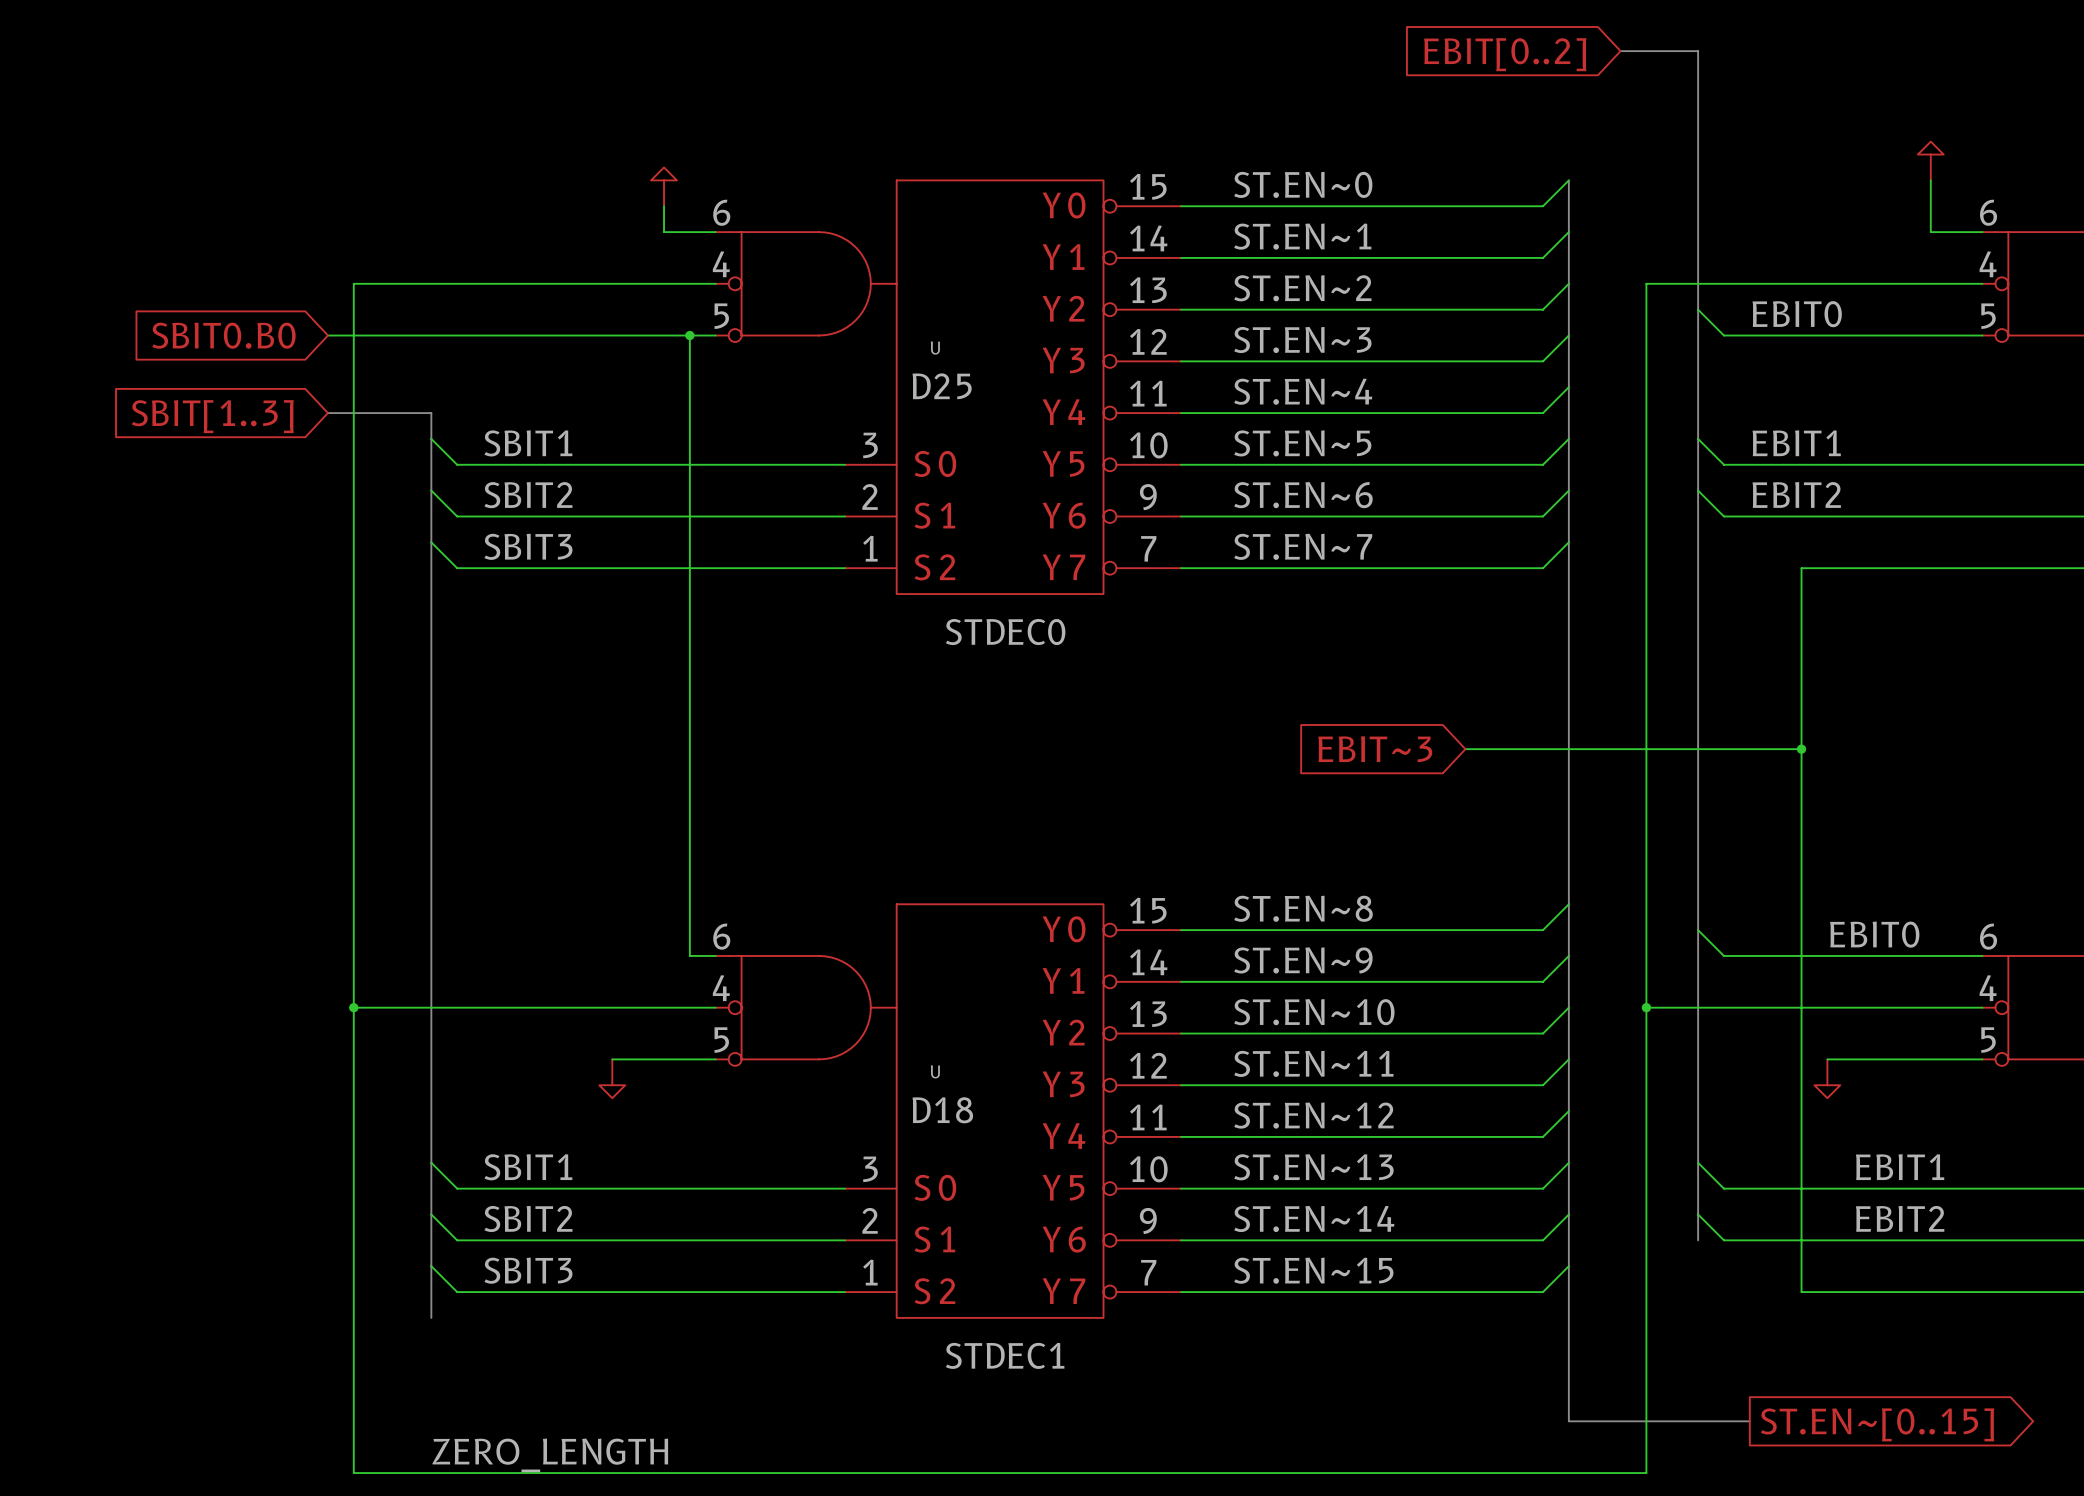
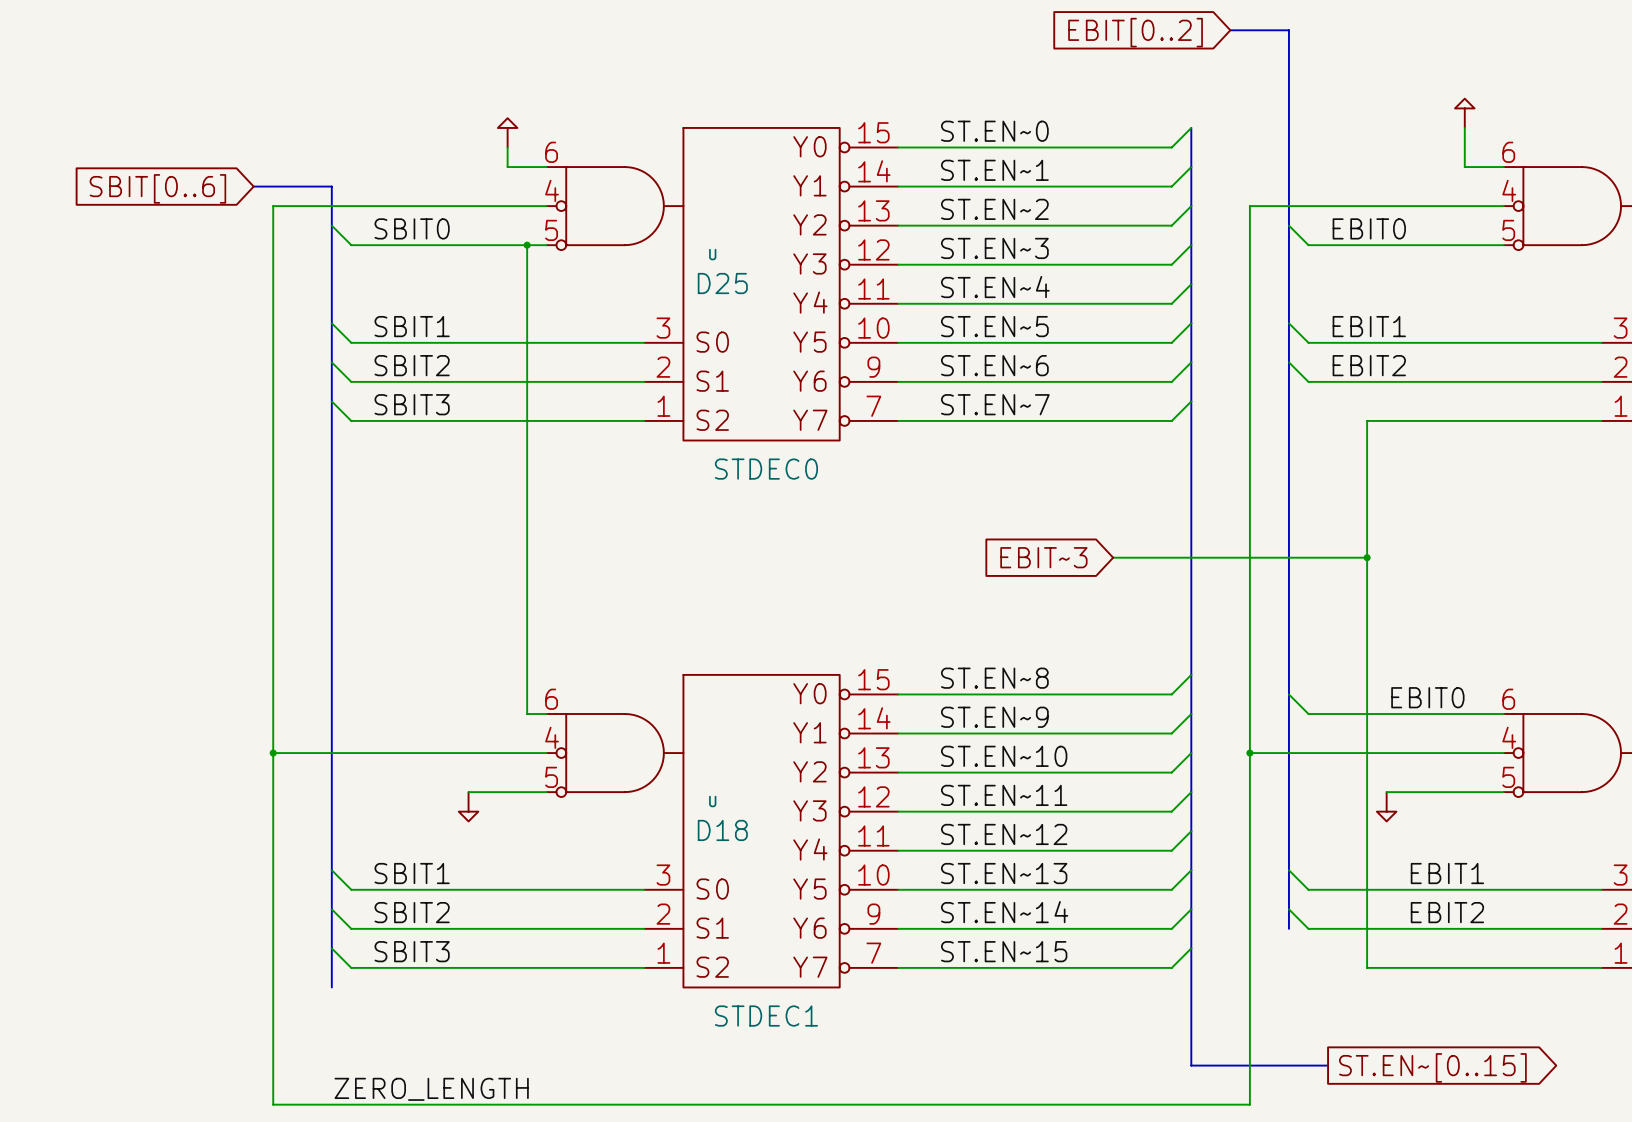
global label: none -> SBIT[0..6] (157, 188)
label: none -> SBIT0 (412, 228)
global label: SBIT0.B0 (223, 335) -> none
wire: (327, 335) (457, 335) -> (331, 225) (351, 245)
bus: (327, 413) (431, 413) -> (253, 186) (331, 186) (331, 303)
global label: SBIT[1..3] (212, 416) -> none

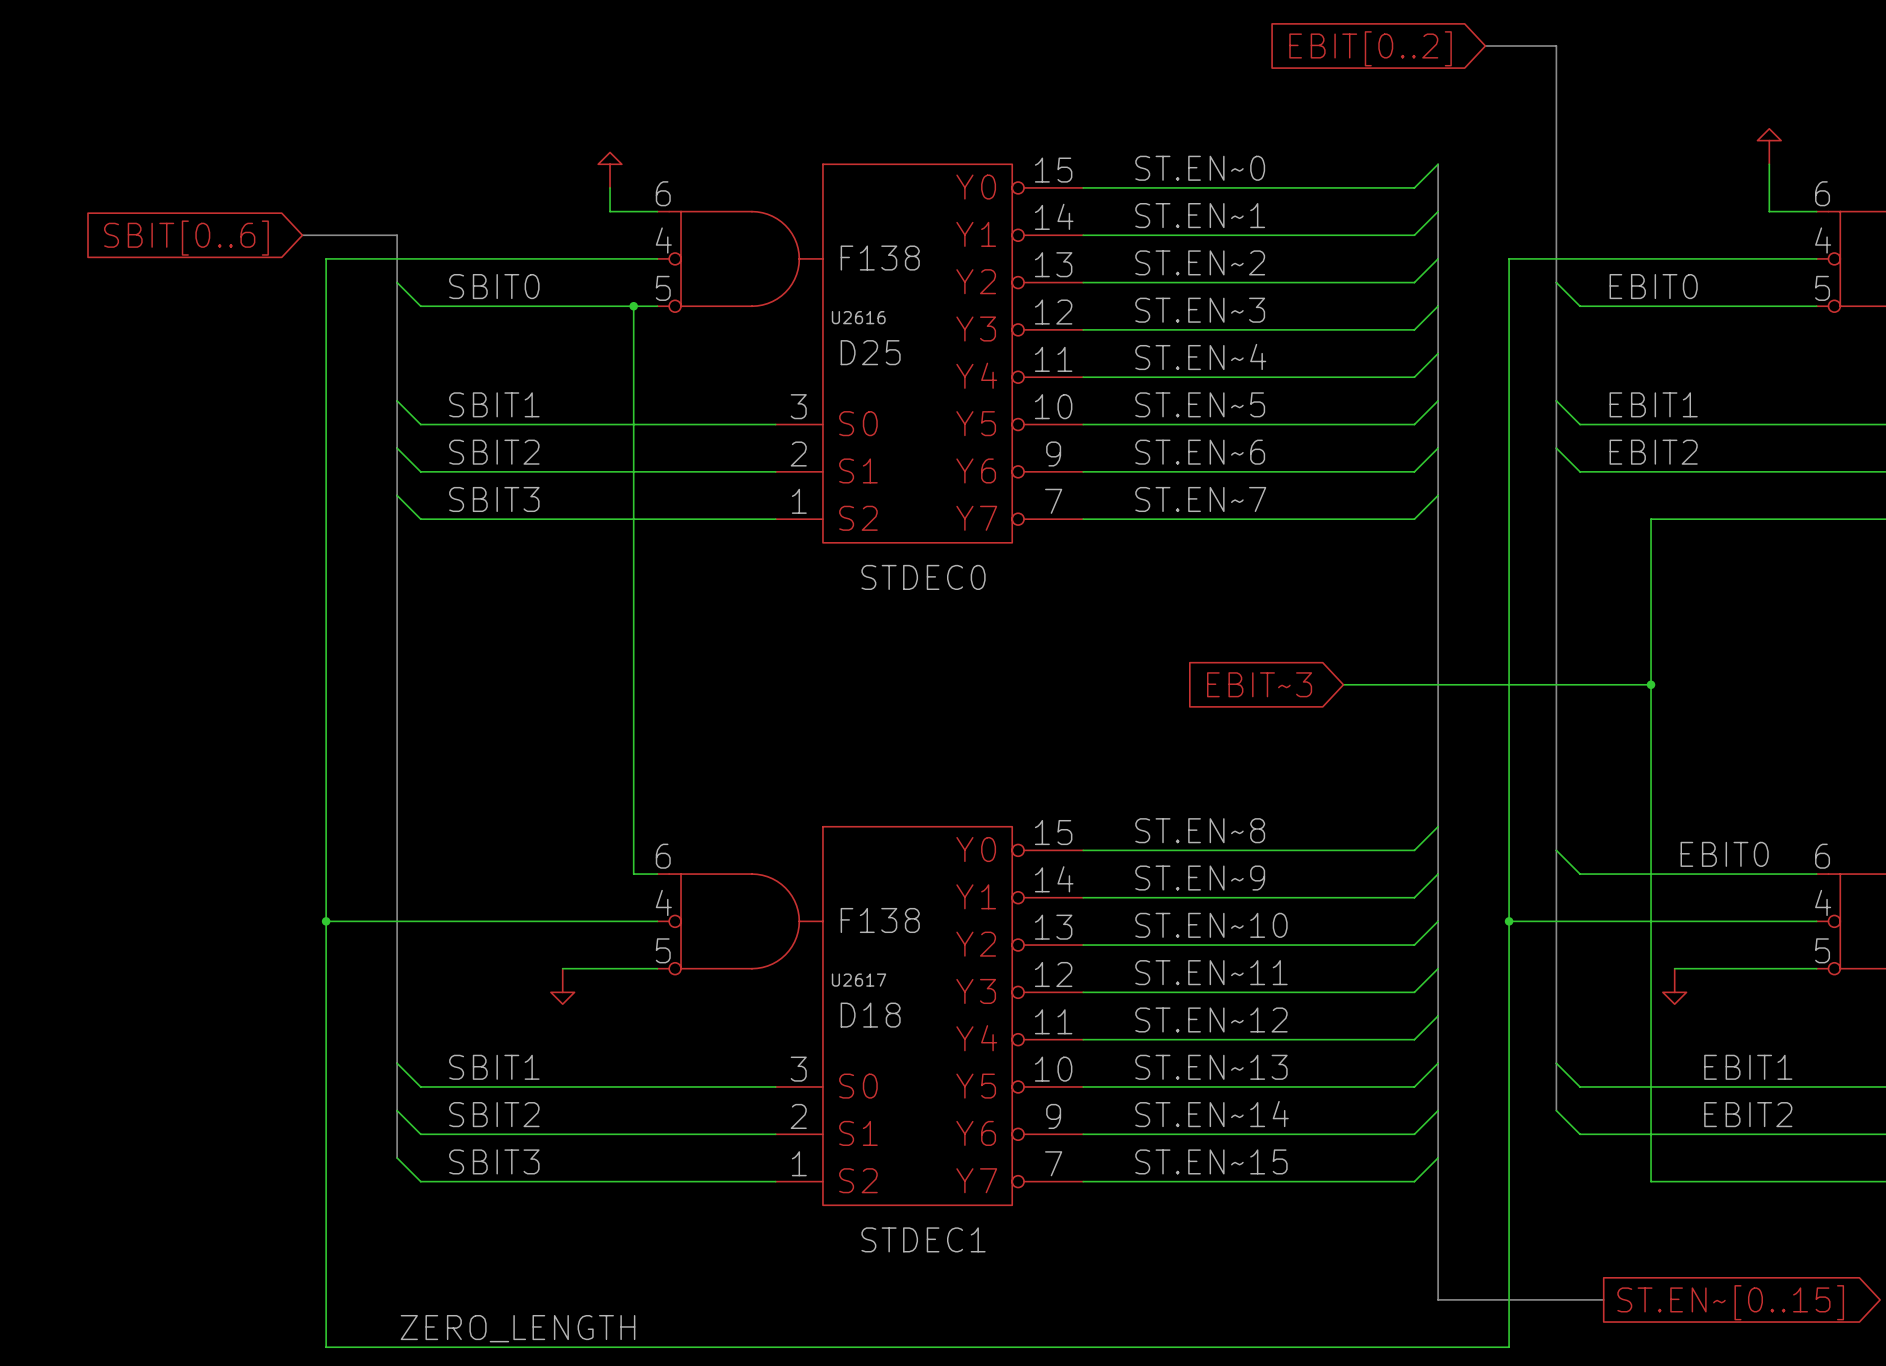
U value: none -> F138 (880, 258)
U name: U (712, 254) -> U2616 (858, 317)
U value: none -> F138 (880, 920)
U name: U (712, 801) -> U2617 (859, 980)
bus: (1288, 909) (1288, 928) -> none
bus: (331, 948) (331, 987) -> none

